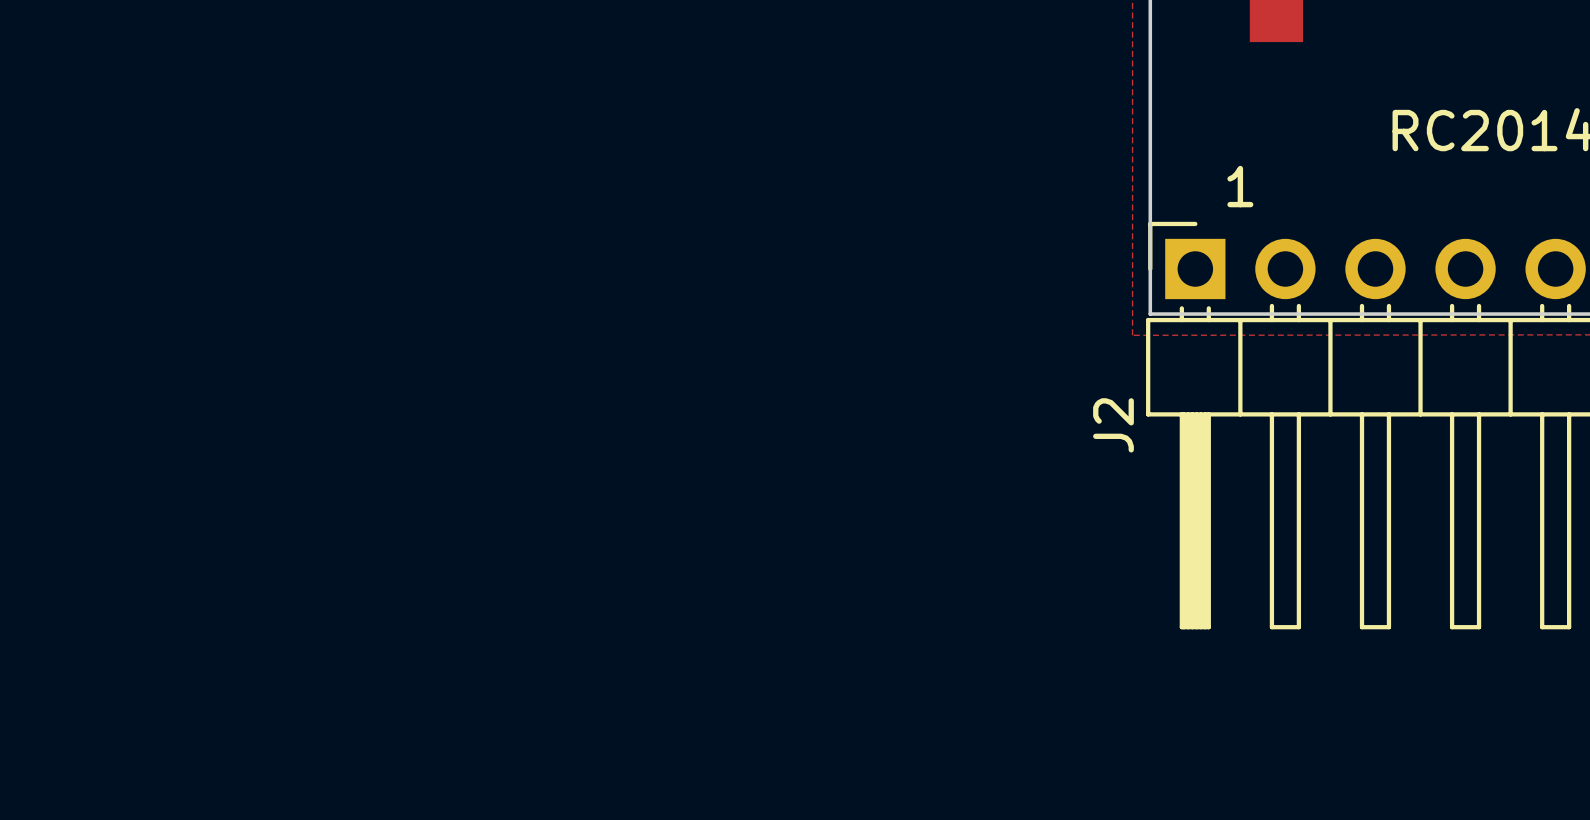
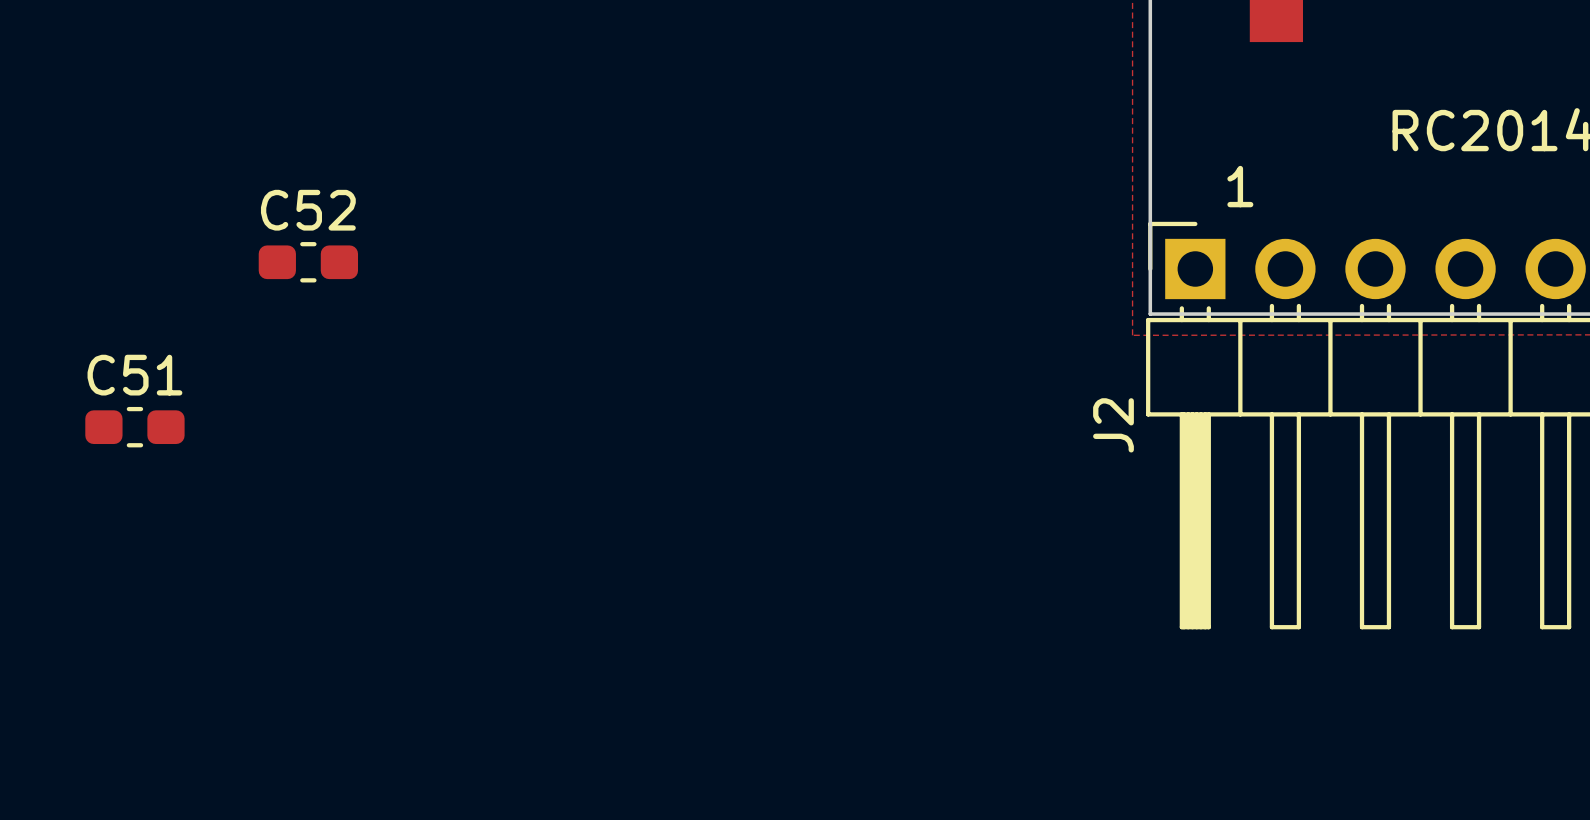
C52: none -> (308, 262)
C51: none -> (134, 427)

